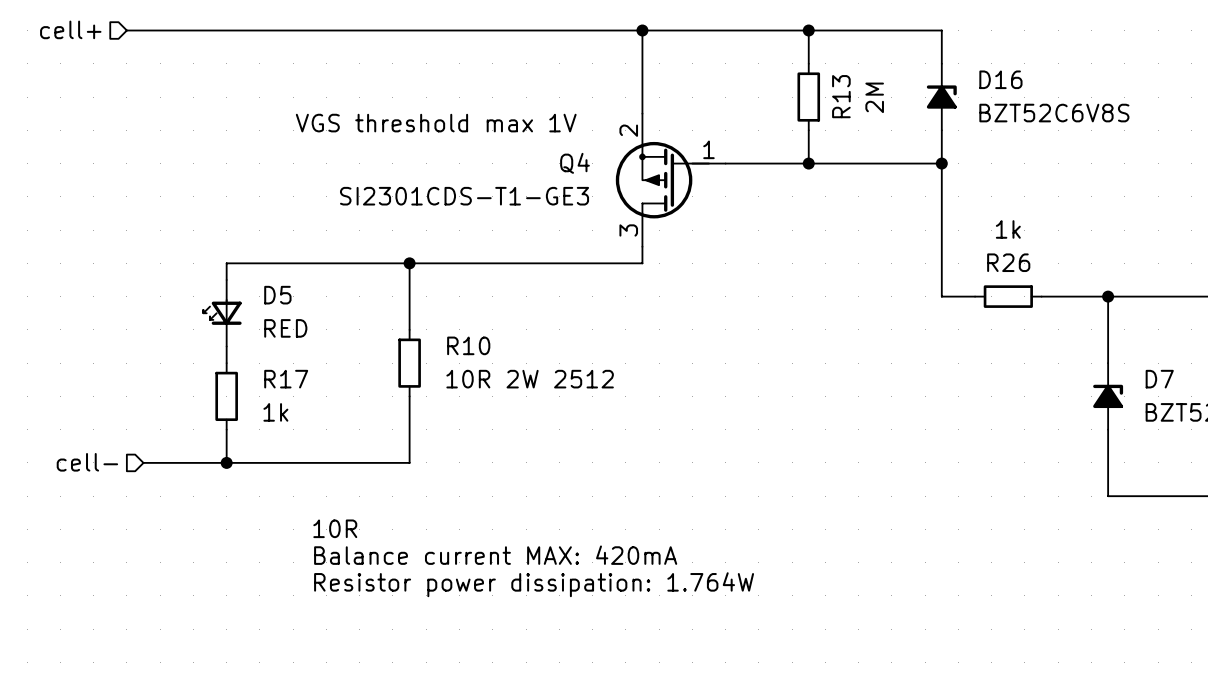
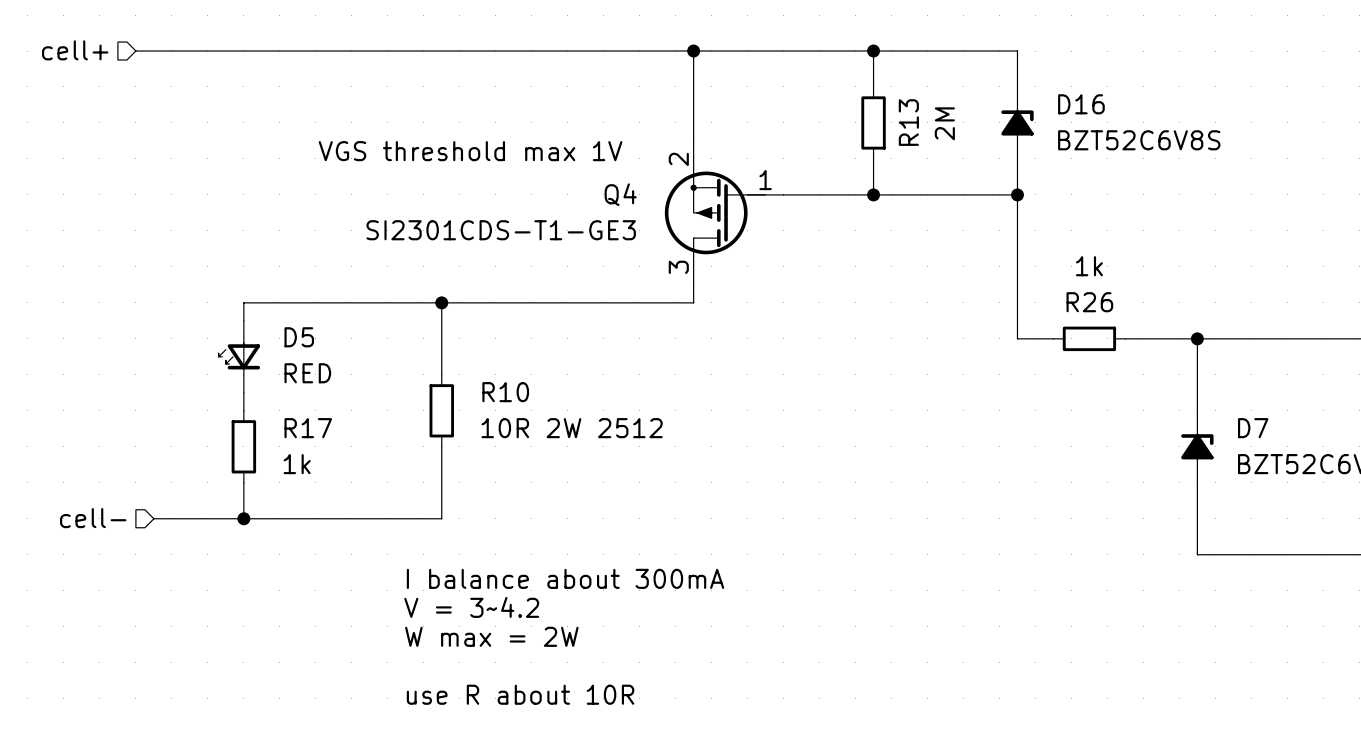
text: none -> I balance about 300mA (565, 578)
text: 10R (335, 528) -> none
text: none -> V = 3~4.2 (471, 607)
text: Balance current MAX: 420mA (495, 555) -> none
text: none -> W max = 2W (491, 636)
text: Resistor power dissipation: 1.764W (534, 584) -> none
text: none -> use R about 10R (520, 694)

